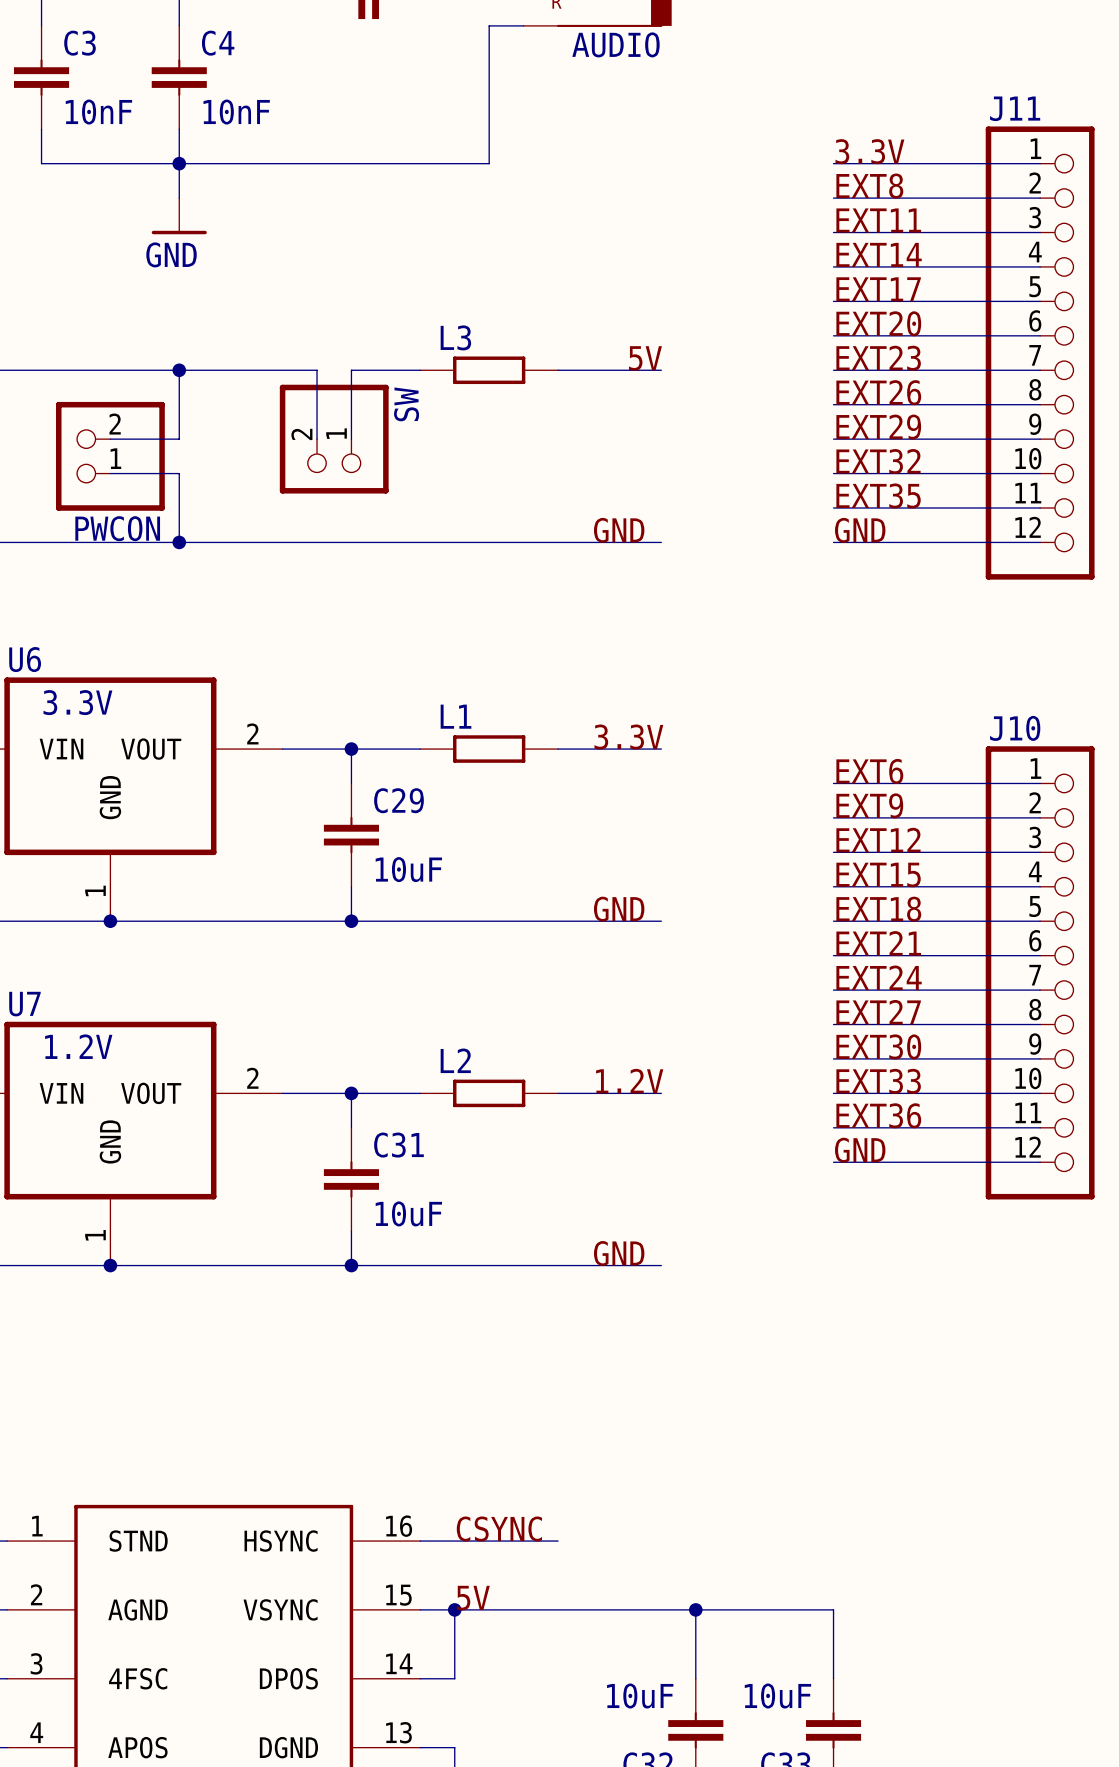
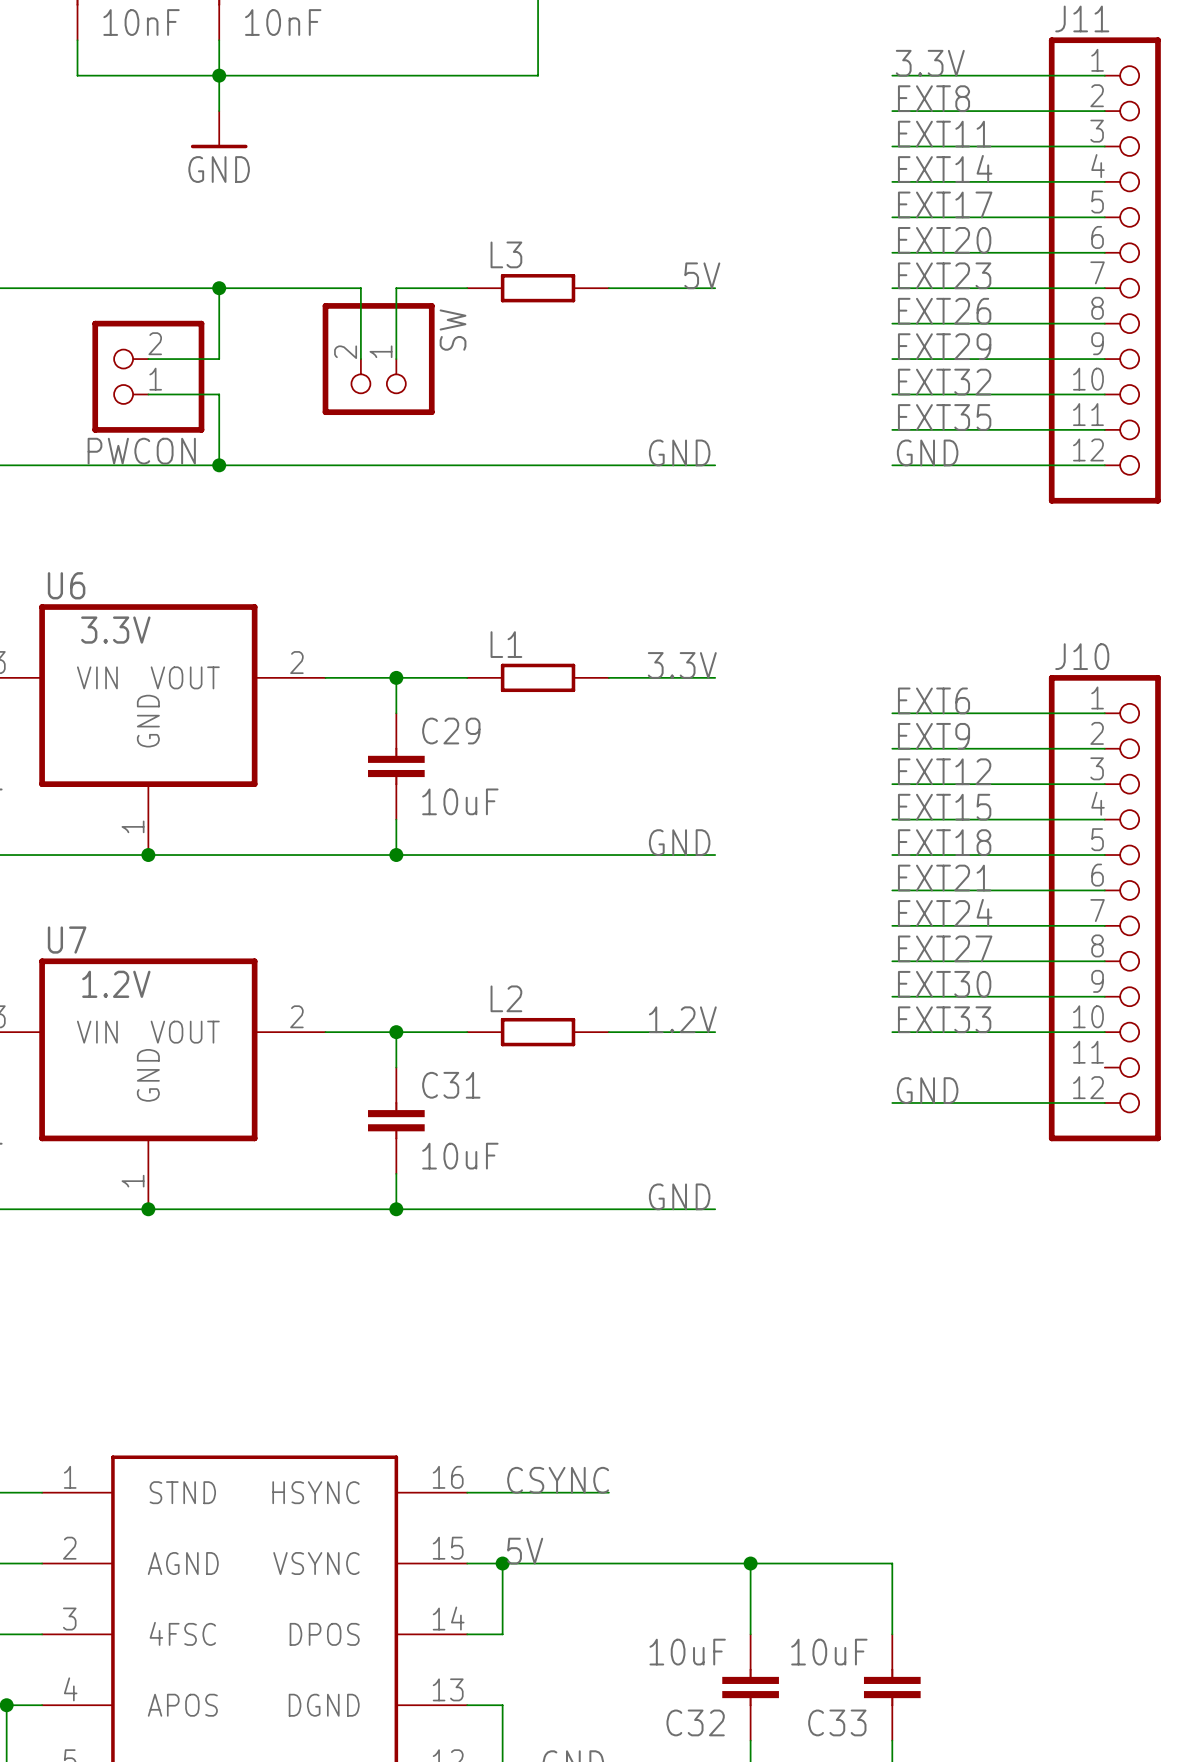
label: EXT36 (878, 1115) -> none
wire: (833, 1127) (1040, 1127) -> none

